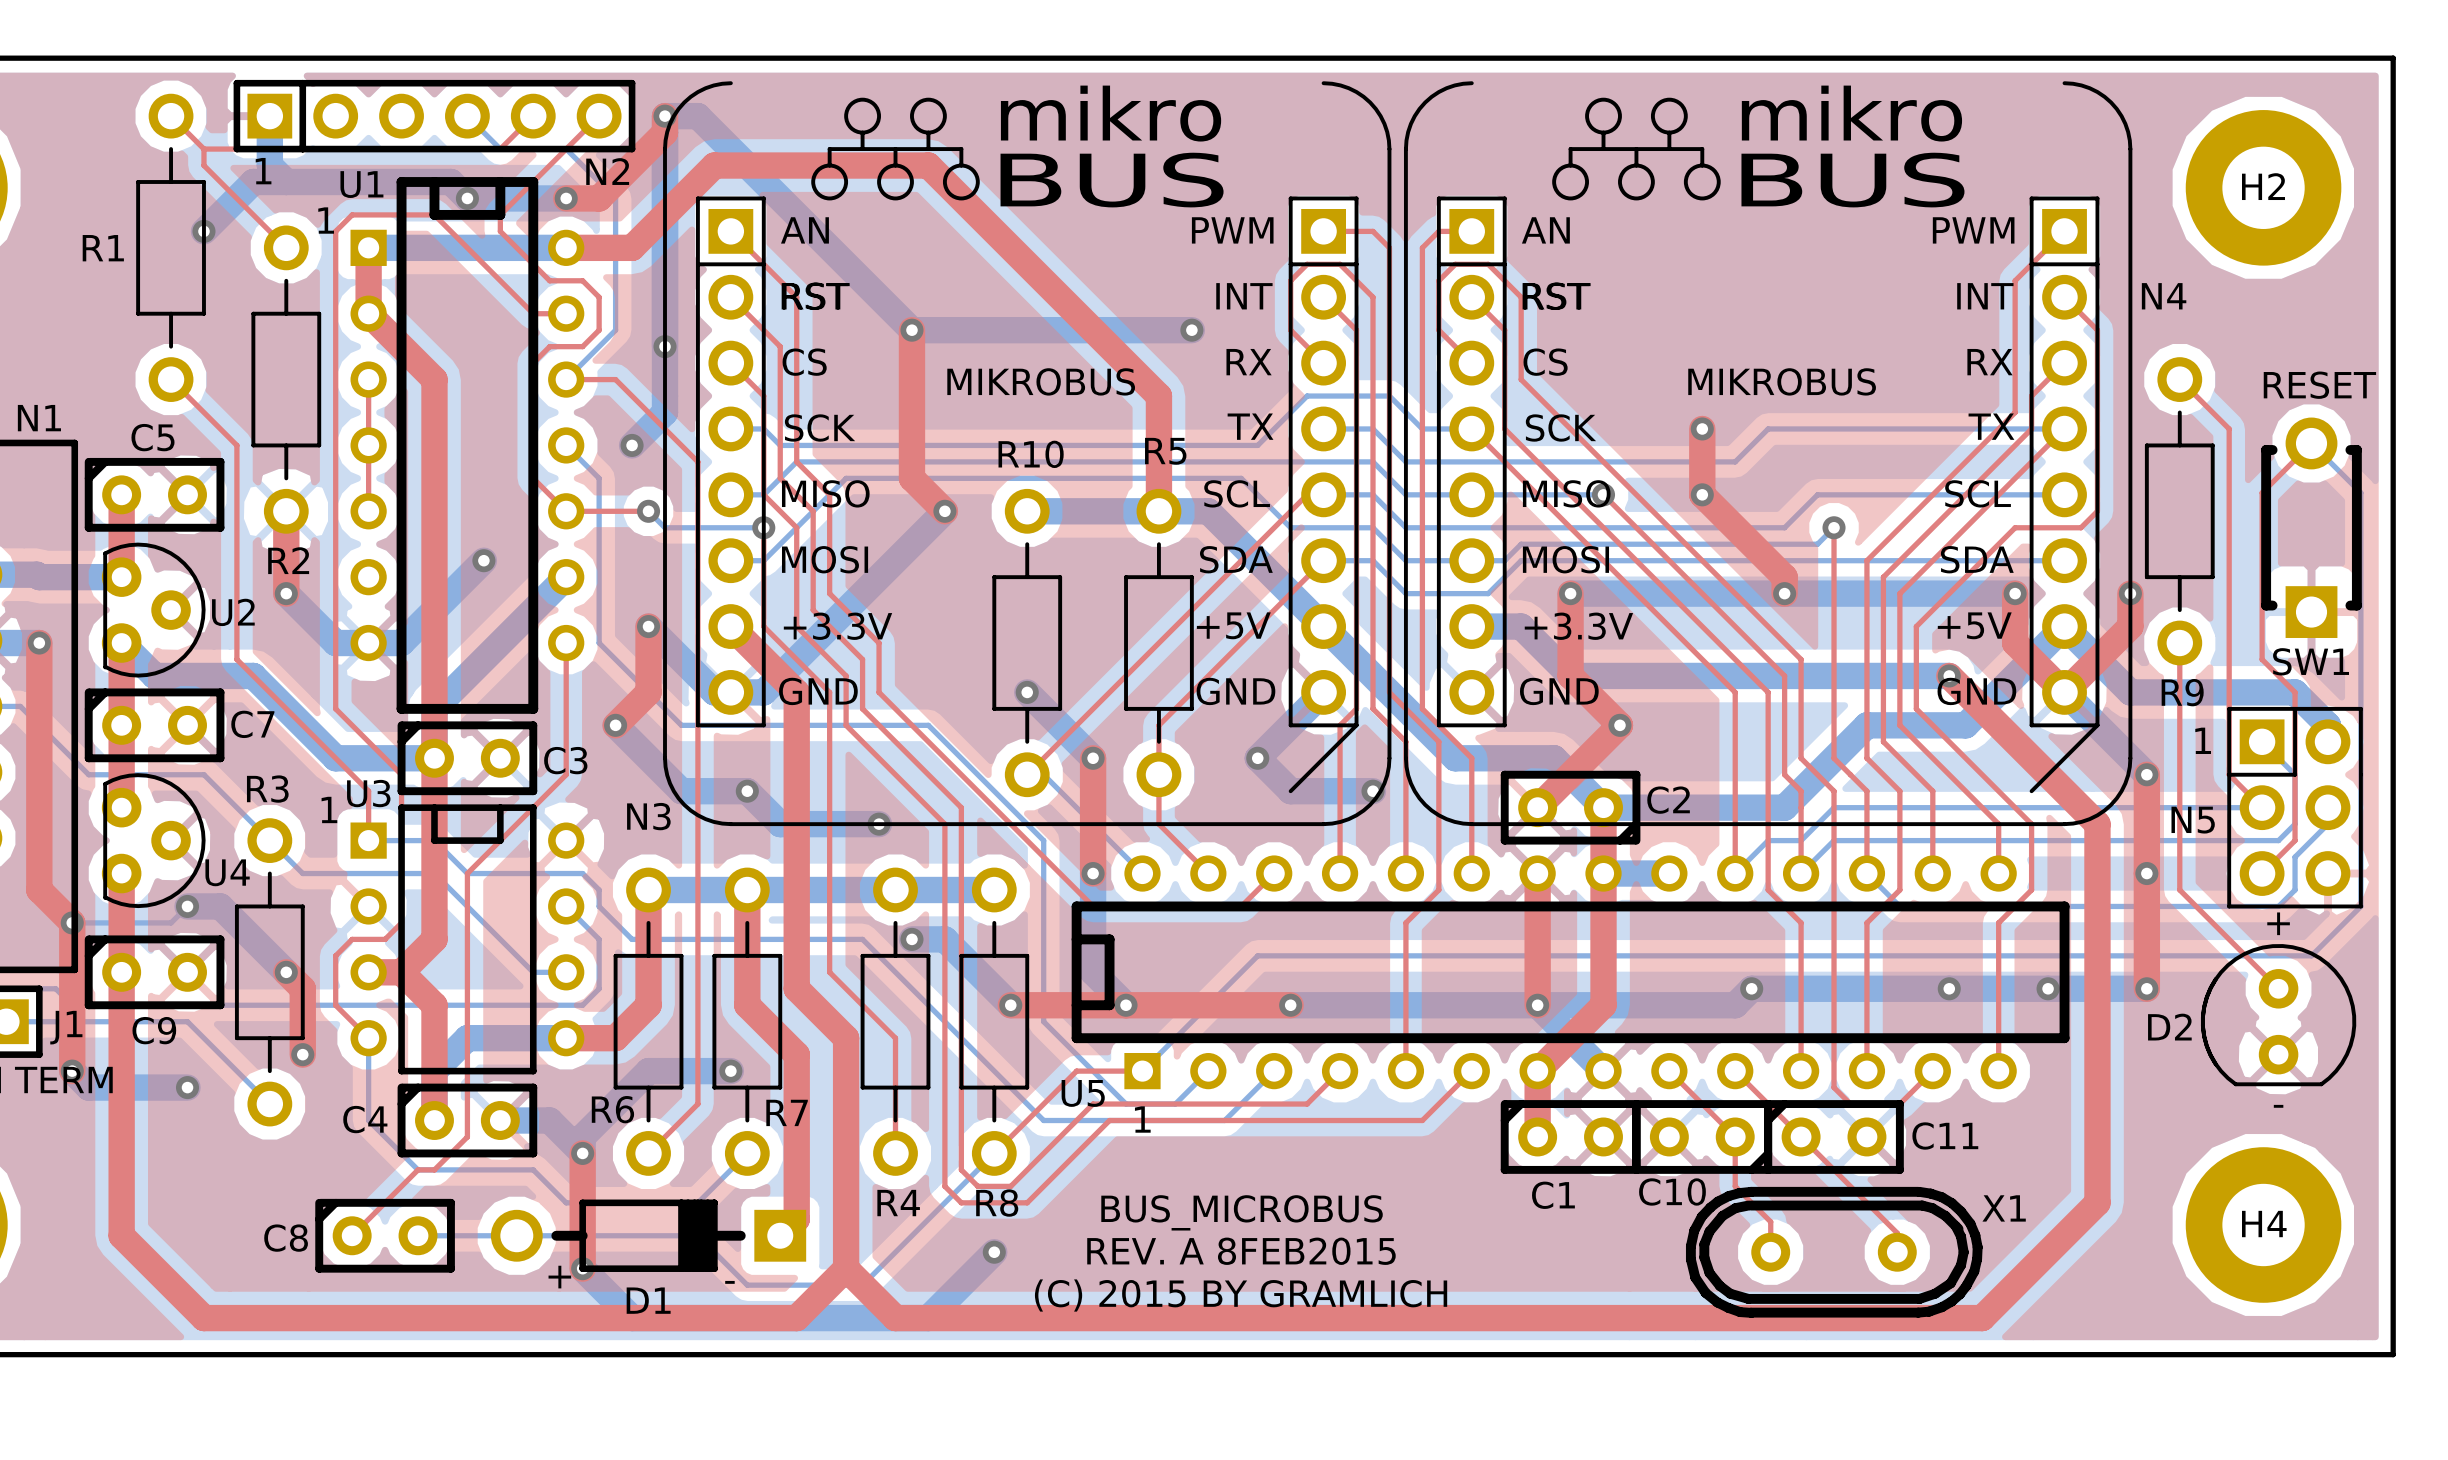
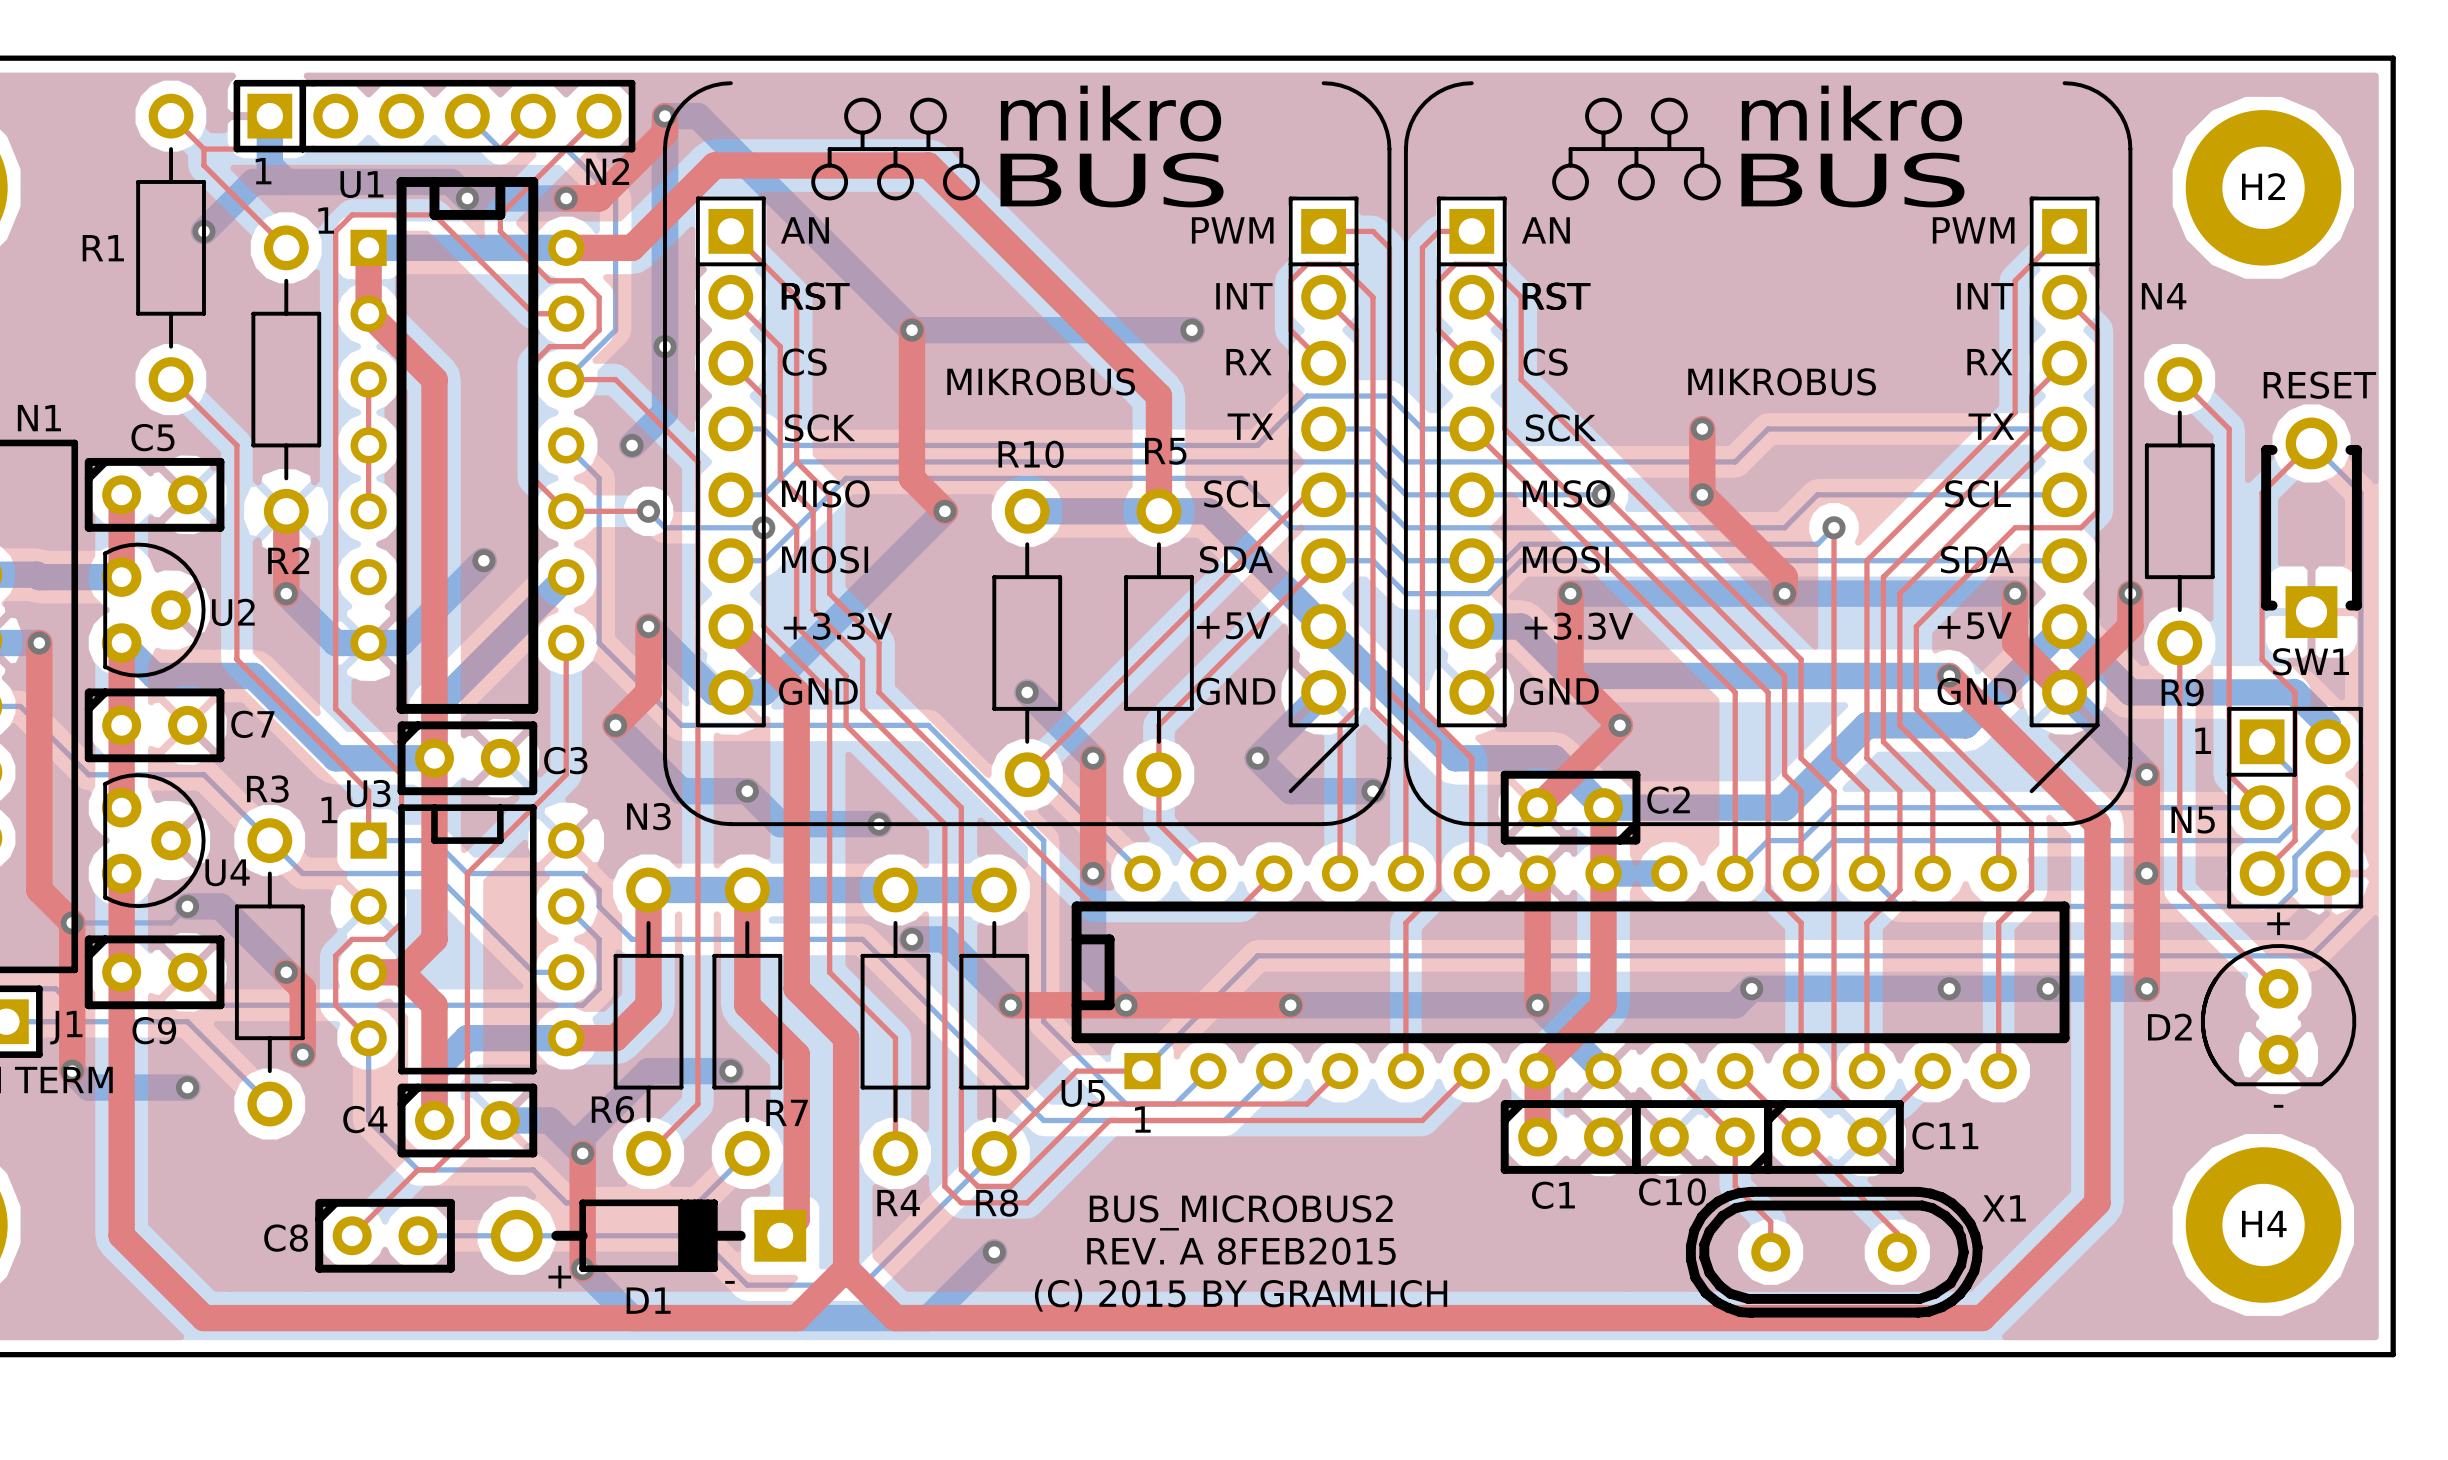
text: BUS_MICROBUS (1242, 1212) -> BUS_MICROBUS2 (1241, 1212)

